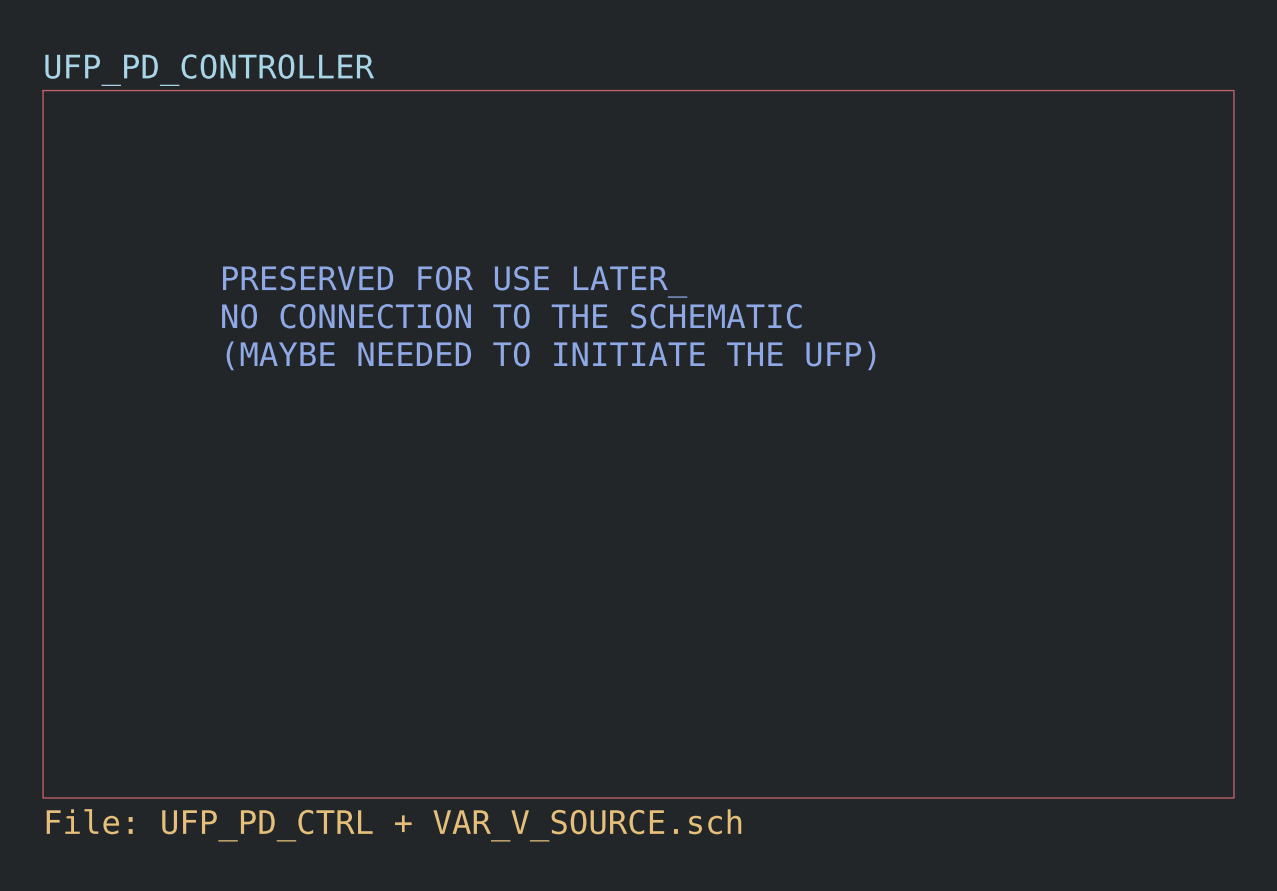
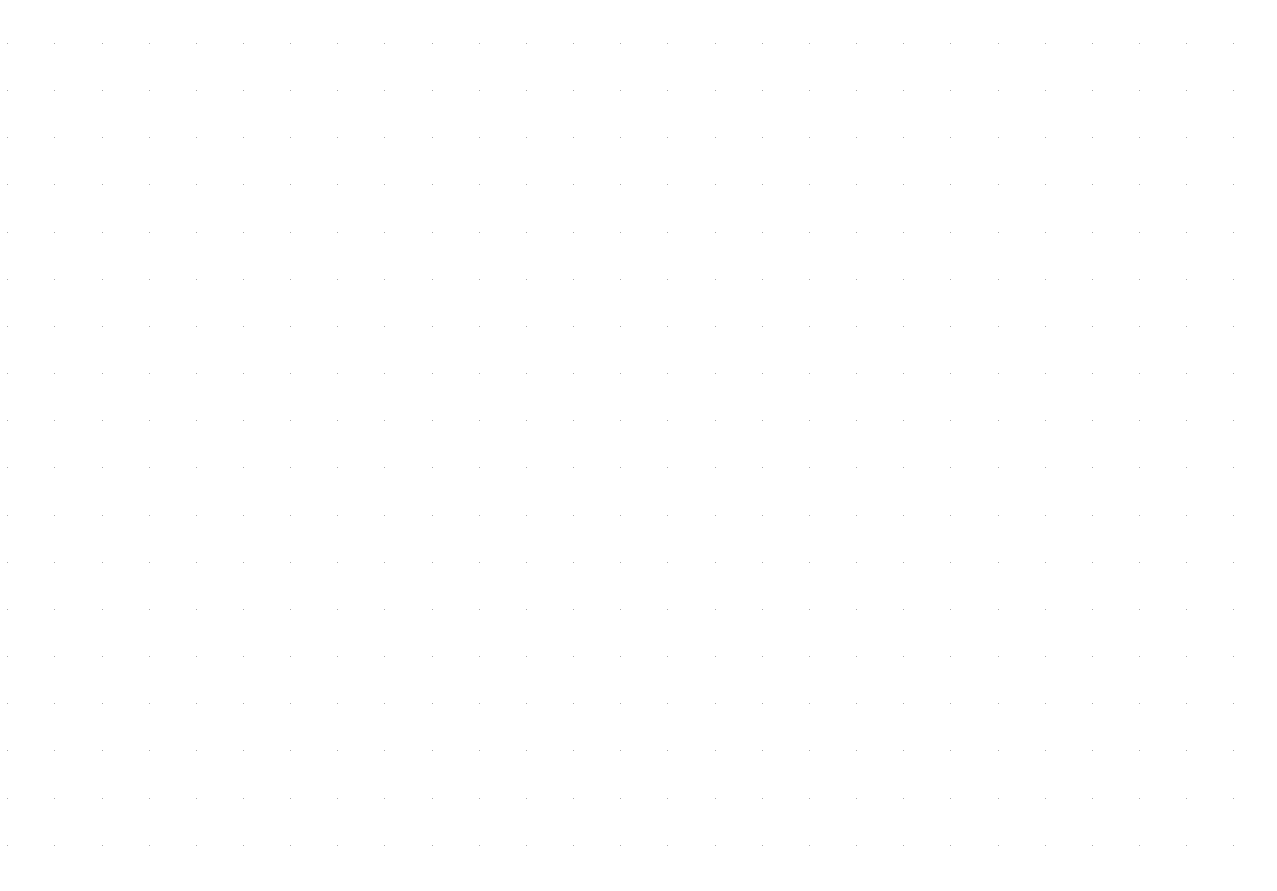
text: PRESERVED FOR USE LATER_ (455, 281) -> none
text: NO CONNECTION TO THE SCHEMATIC (511, 316) -> none
text: (MAYBE NEEDED TO INITIATE THE UFP) (550, 355) -> none
sheet UFP_PD_CONTROLLER: File: UFP_PD_CTRL + VAR_V_SOURCE.sch (638, 444) -> none

